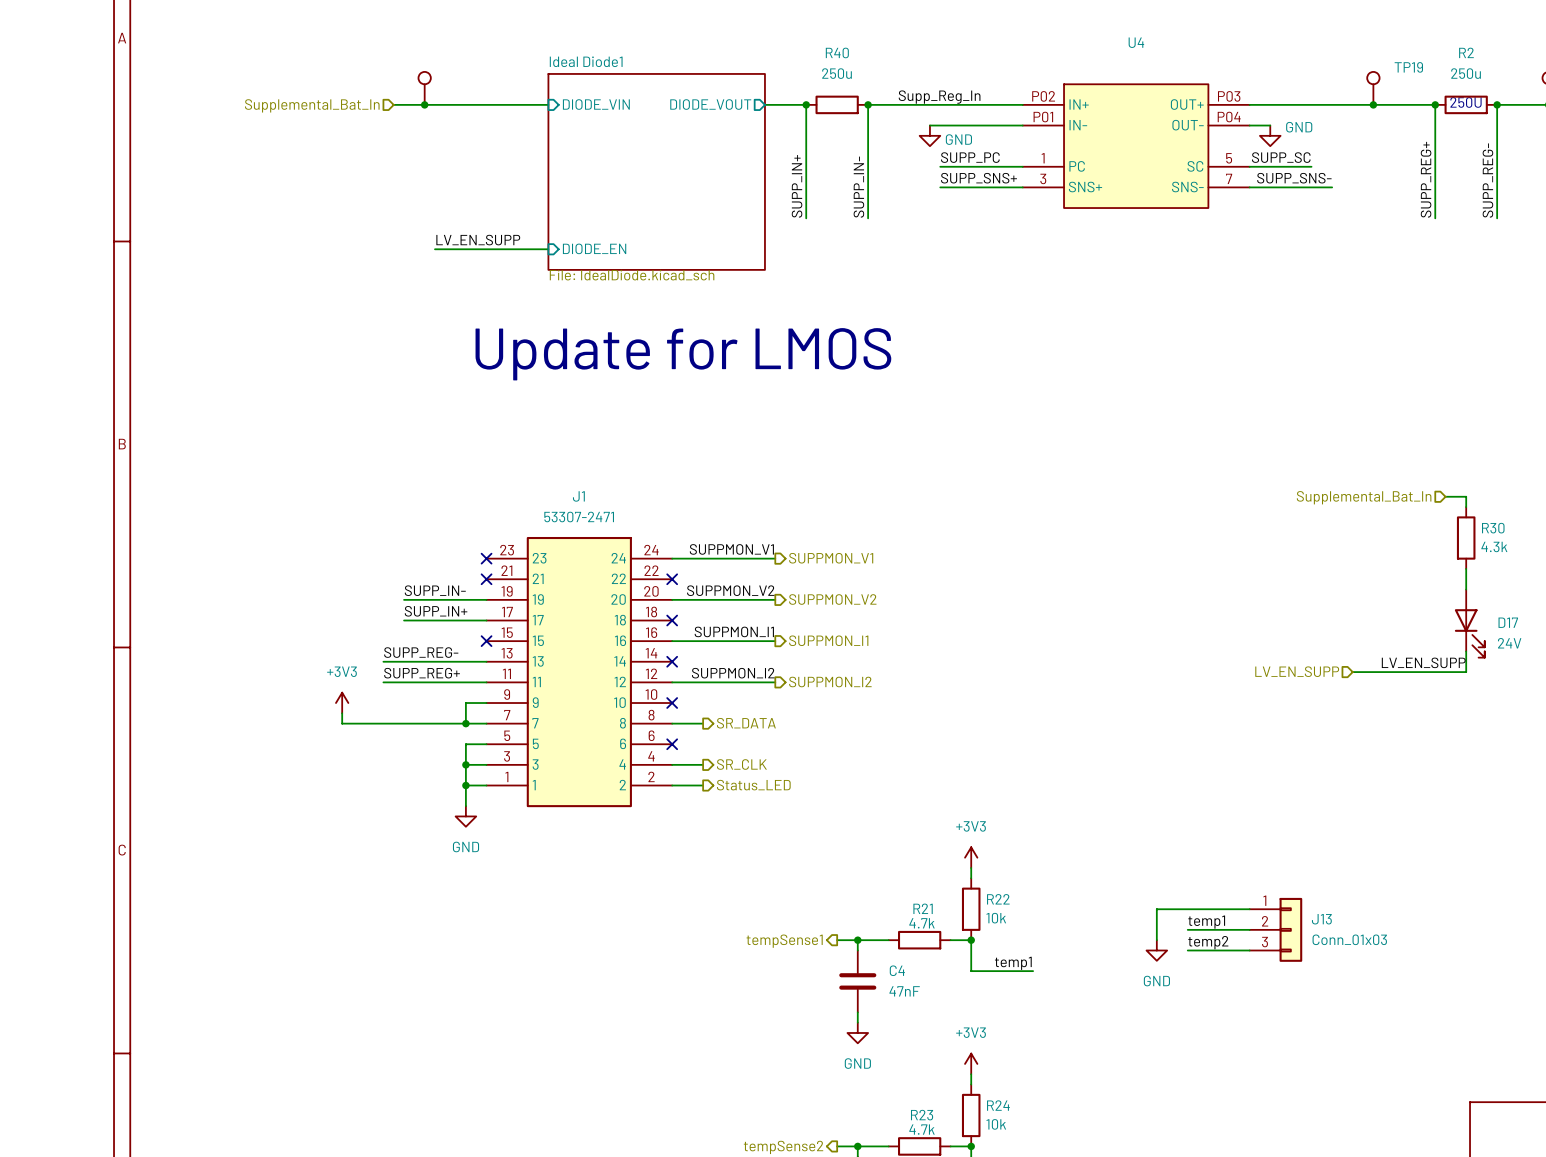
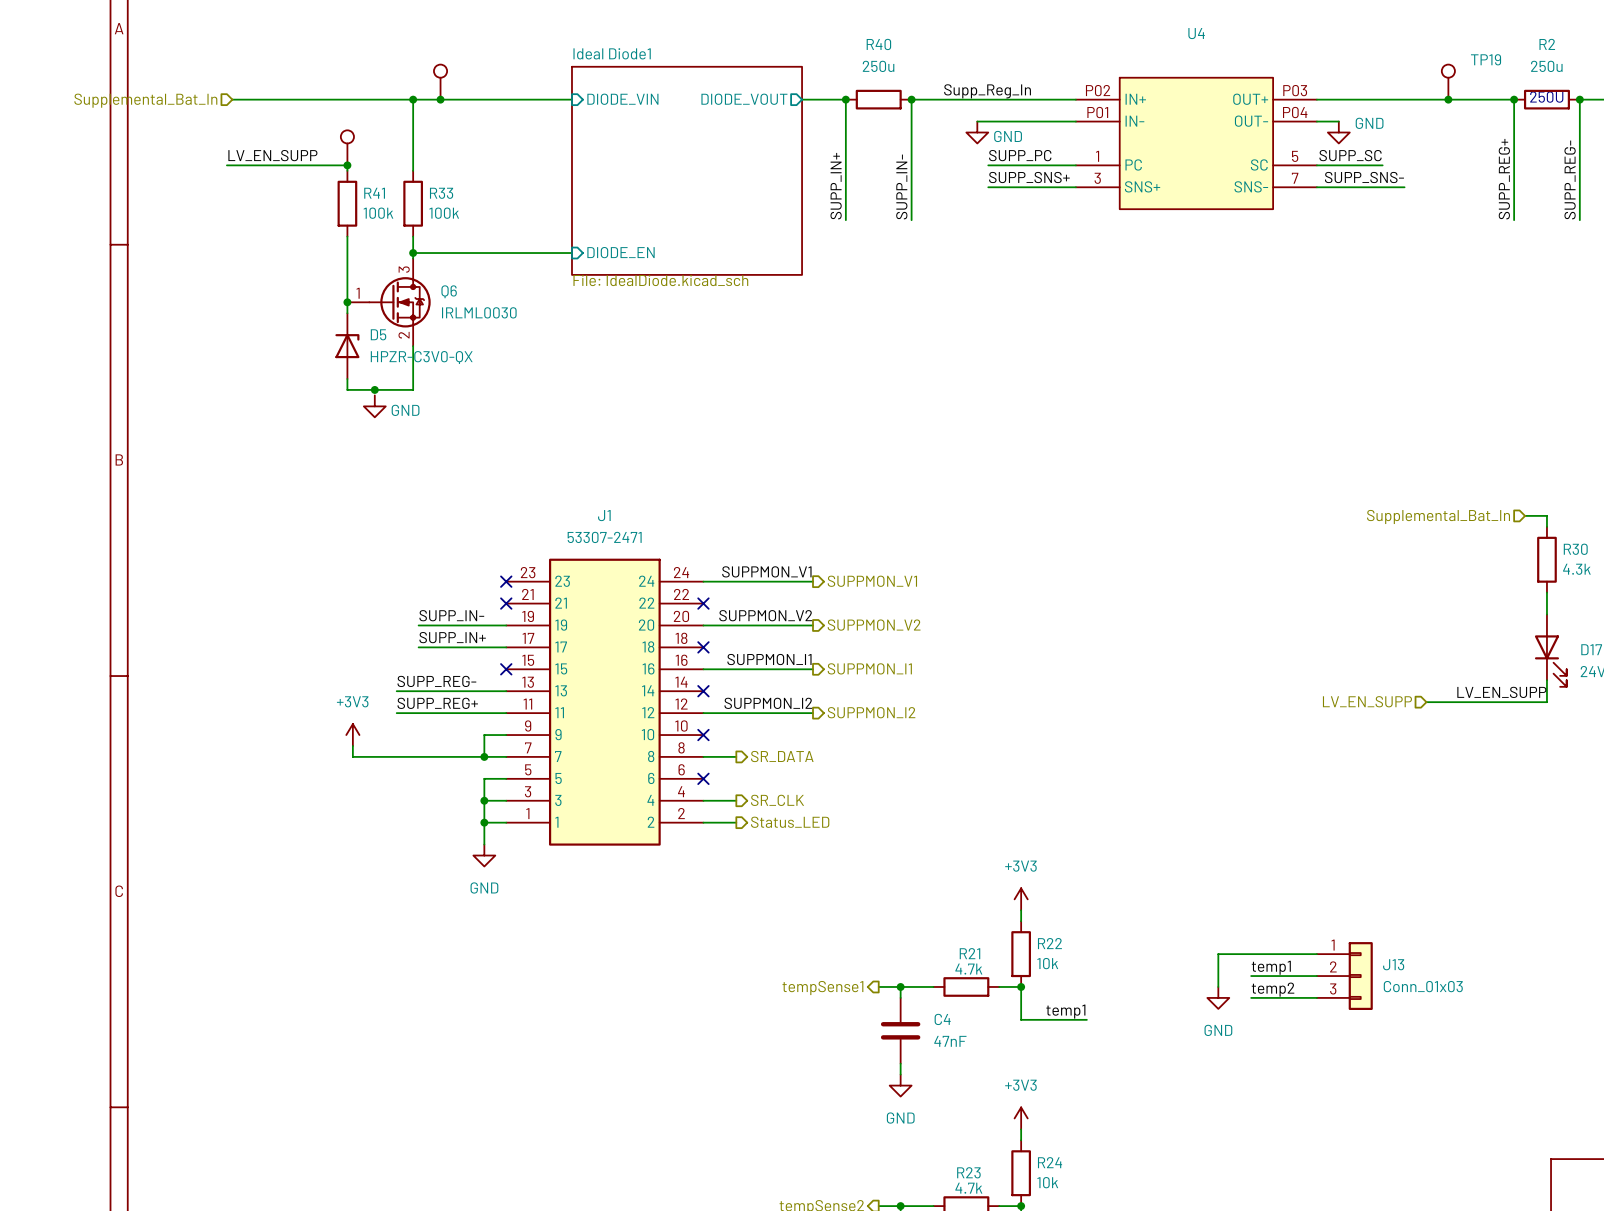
wire: none -> (232, 99) (407, 99)
wire: none -> (413, 99) (413, 170)
junction: none -> (413, 99)
hierarchical label position: Supplemental_Bat_In (312, 105) -> Supplemental_Bat_In (145, 100)
part: none -> (347, 147)
label: none -> LV_EN_SUPP (272, 155)
wire: none -> (226, 165) (347, 165) (347, 170)
junction: none -> (347, 165)
R41: none -> 100k (347, 203)
R33: none -> 100k (413, 203)
wire: none -> (347, 236) (347, 313)
wire: none -> (413, 236) (413, 258)
label: LV_EN_SUPP (478, 240) -> none
wire: none -> (413, 253) (451, 253)
junction: none -> (413, 253)
junction: none -> (347, 302)
Q6: none -> IRLML0030 (389, 302)
D5: none -> HPZR-C3V0-QX (347, 346)
wire: none -> (413, 346) (413, 389) (347, 389) (347, 378)
text: Update for LMOS (683, 354) -> none
junction: none -> (374, 389)
power symbol: none -> GND (374, 406)

